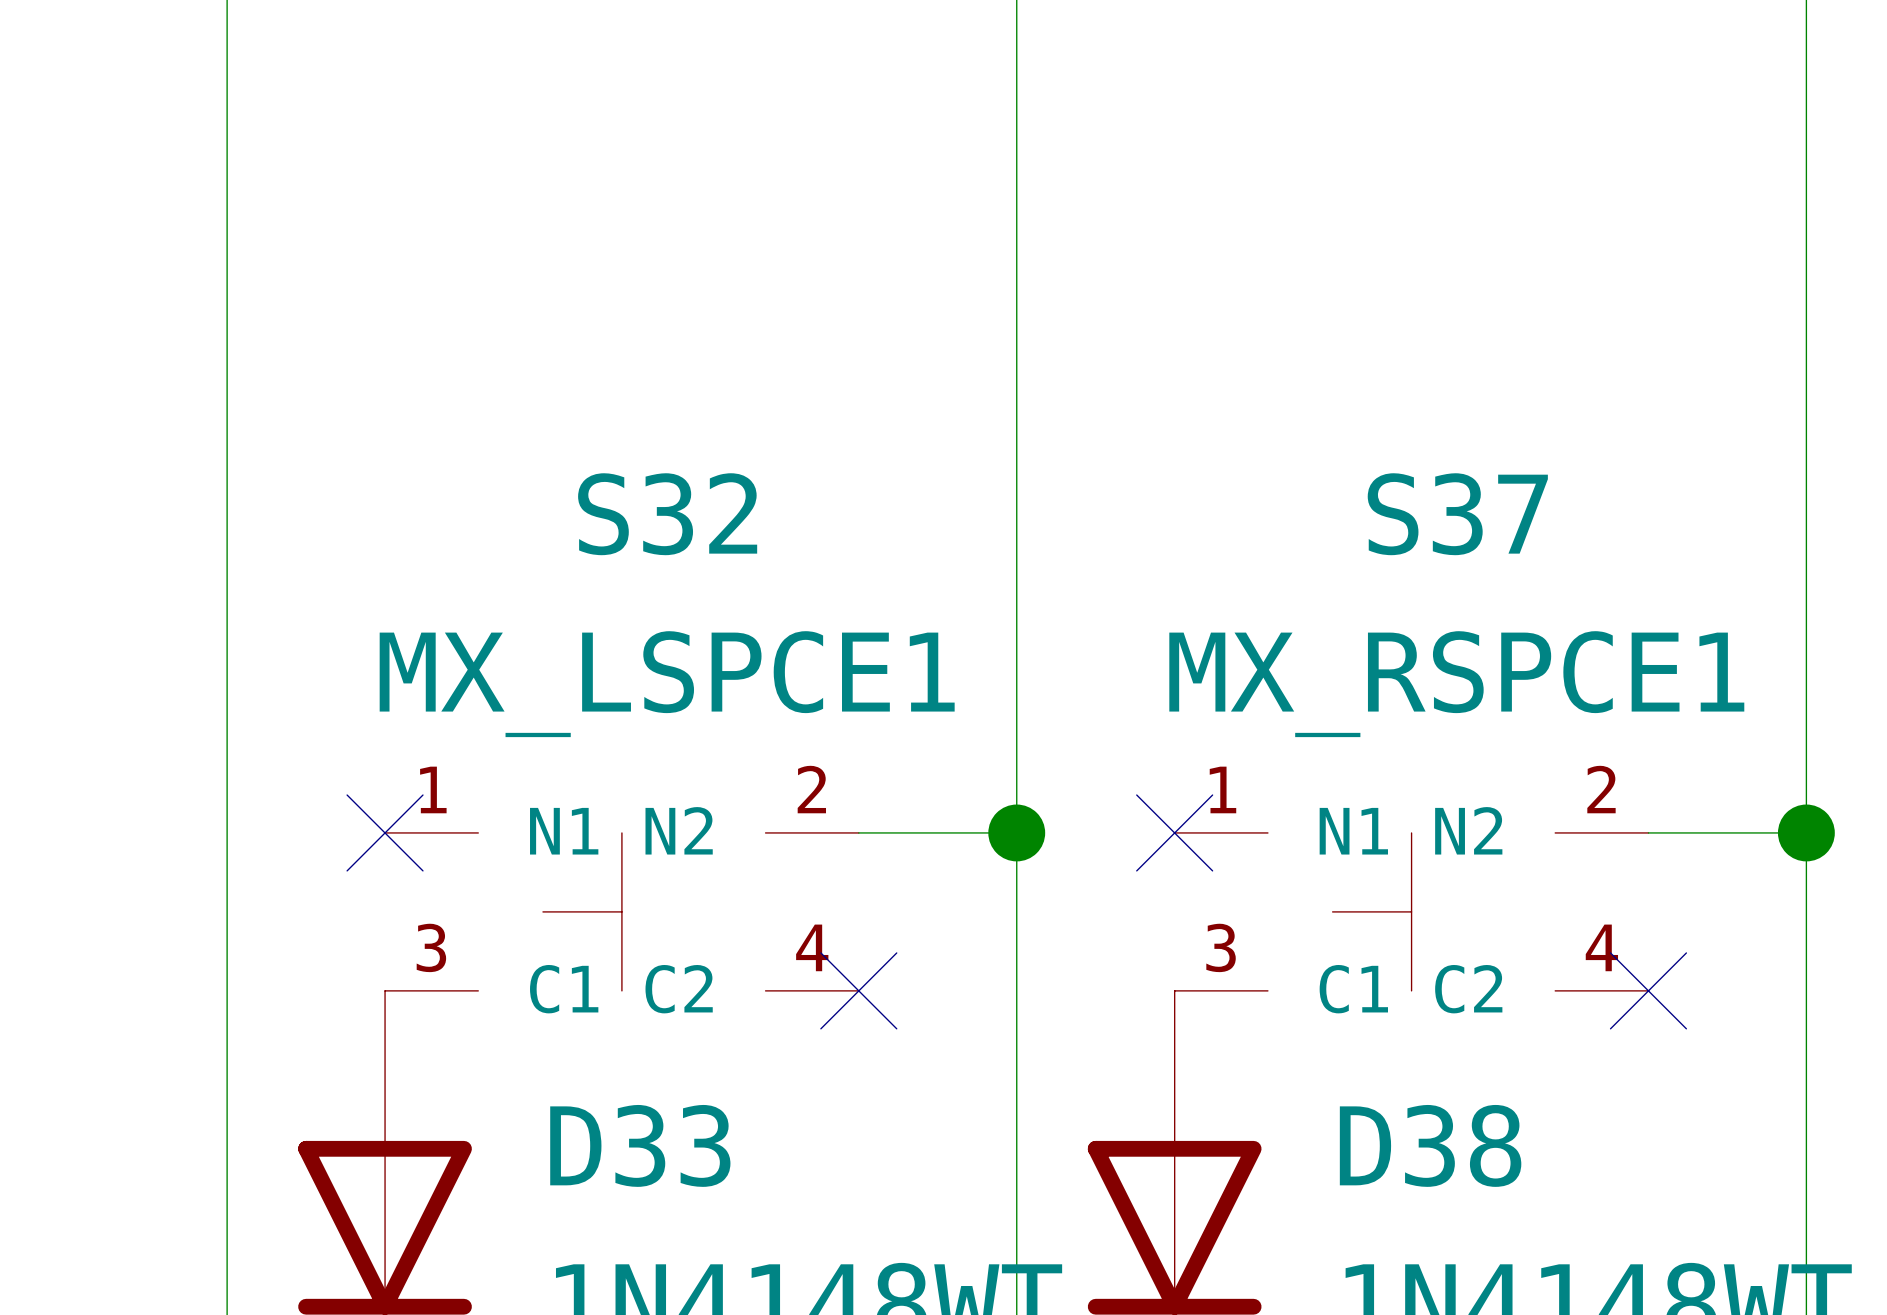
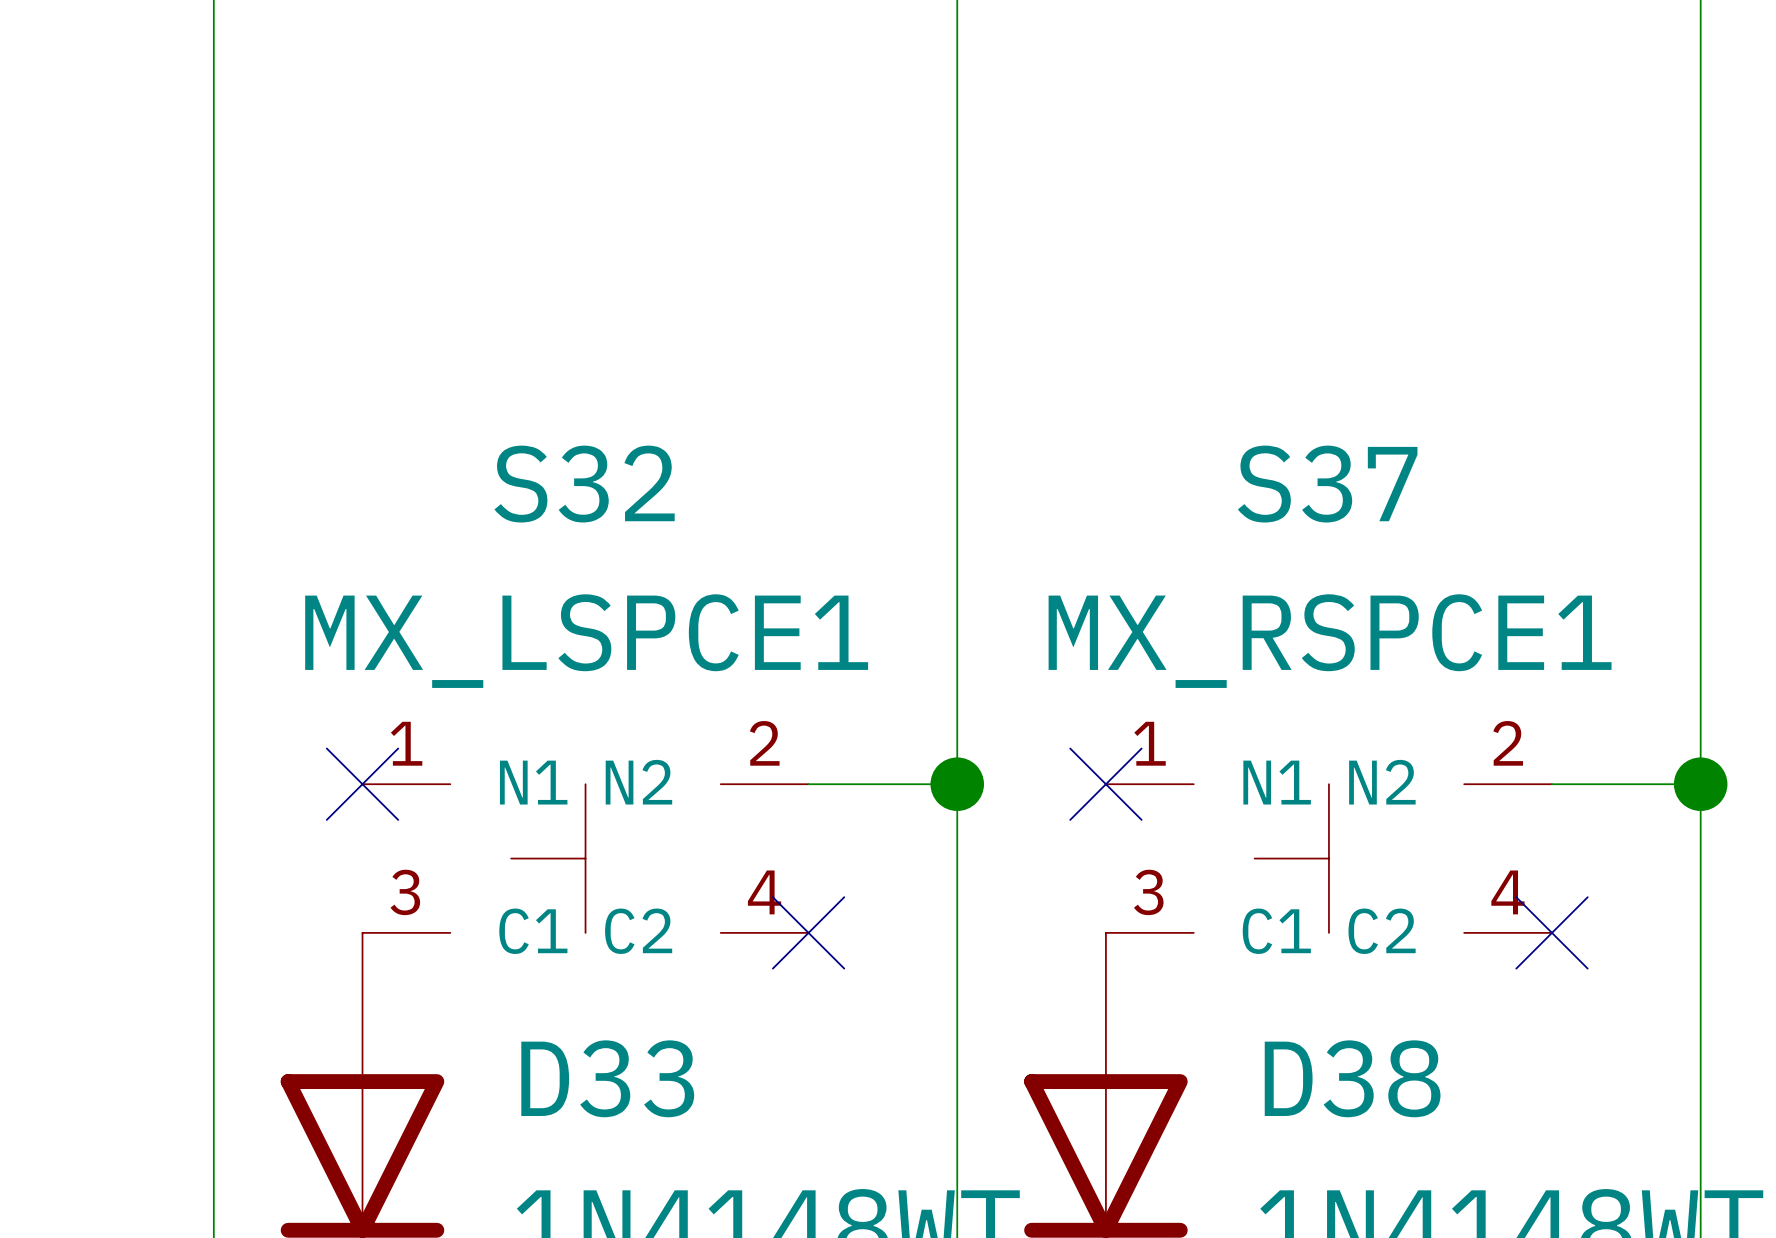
S32 name position: S32 (667, 514) -> S32 (584, 484)
S37 name position: S37 (1457, 514) -> S37 (1327, 484)
S32 value position: MX_LSPCE1 (667, 684) -> MX_LSPCE1 (586, 641)
S37 value position: MX_RSPCE1 (1456, 684) -> MX_RSPCE1 (1330, 641)

